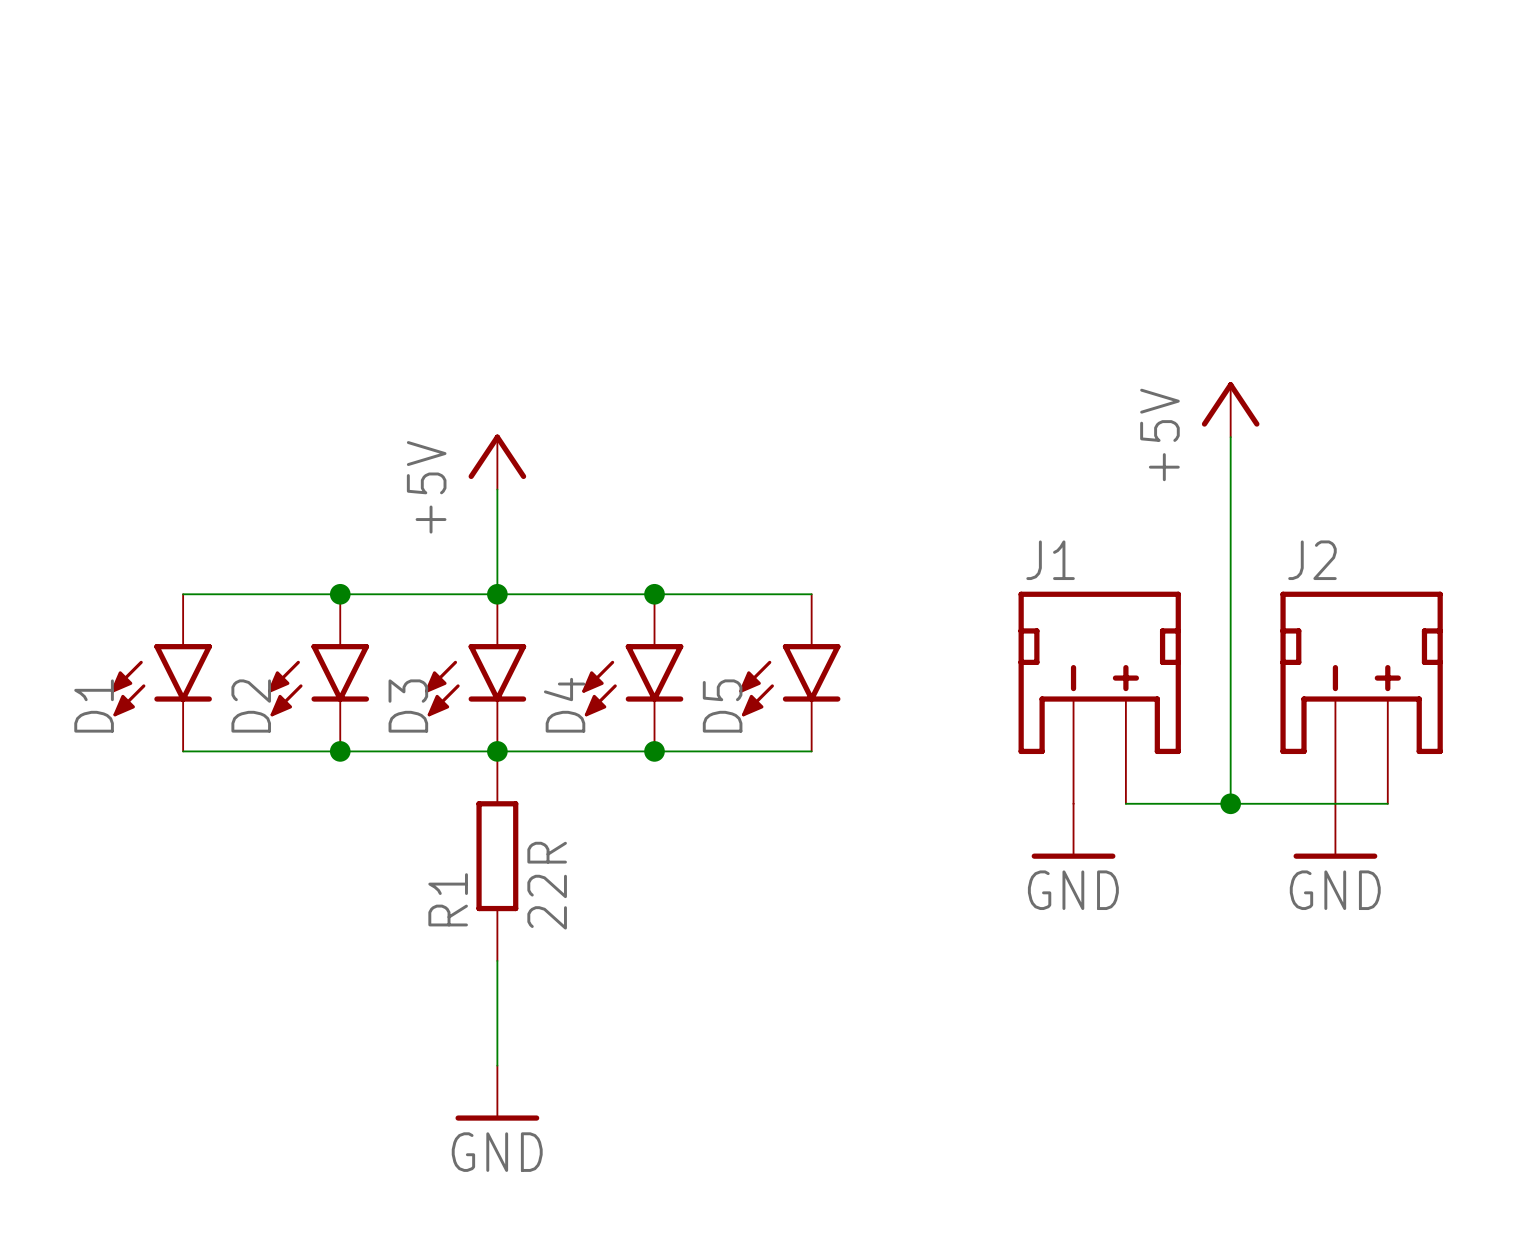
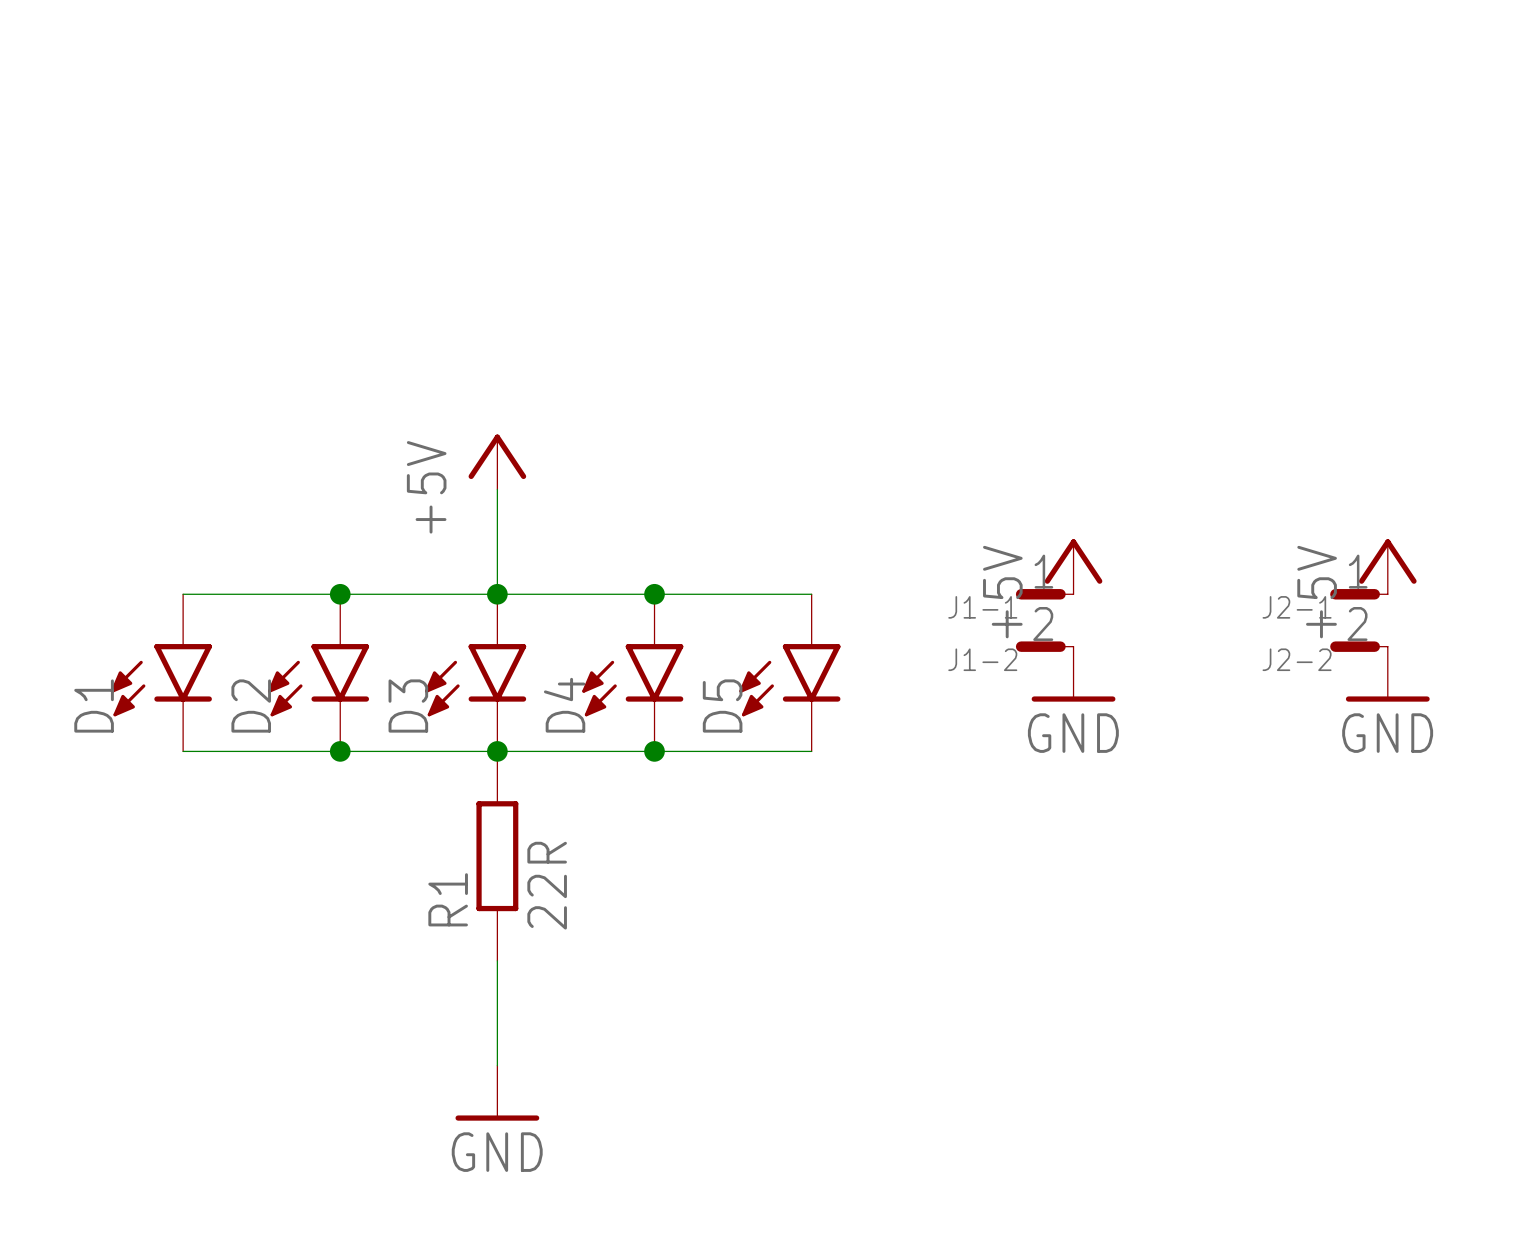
power symbol: +5V (1230, 409) -> none
wire: (1230, 437) (1230, 803) -> none
power symbol: none -> +5V (1073, 566)
power symbol: none -> +5V (1387, 566)
J1-1: none -> (1044, 594)
J2-1: none -> (1358, 594)
J1-2: none -> (1044, 646)
J2-2: none -> (1358, 646)
power symbol: none -> GND (1073, 674)
power symbol: none -> GND (1387, 674)
J1: (1099, 697) -> none
J2: (1361, 697) -> none
wire: (1125, 803) (1387, 803) -> none
junction: (1230, 803) -> none
power symbol: GND (1073, 831) -> none
power symbol: GND (1335, 831) -> none

